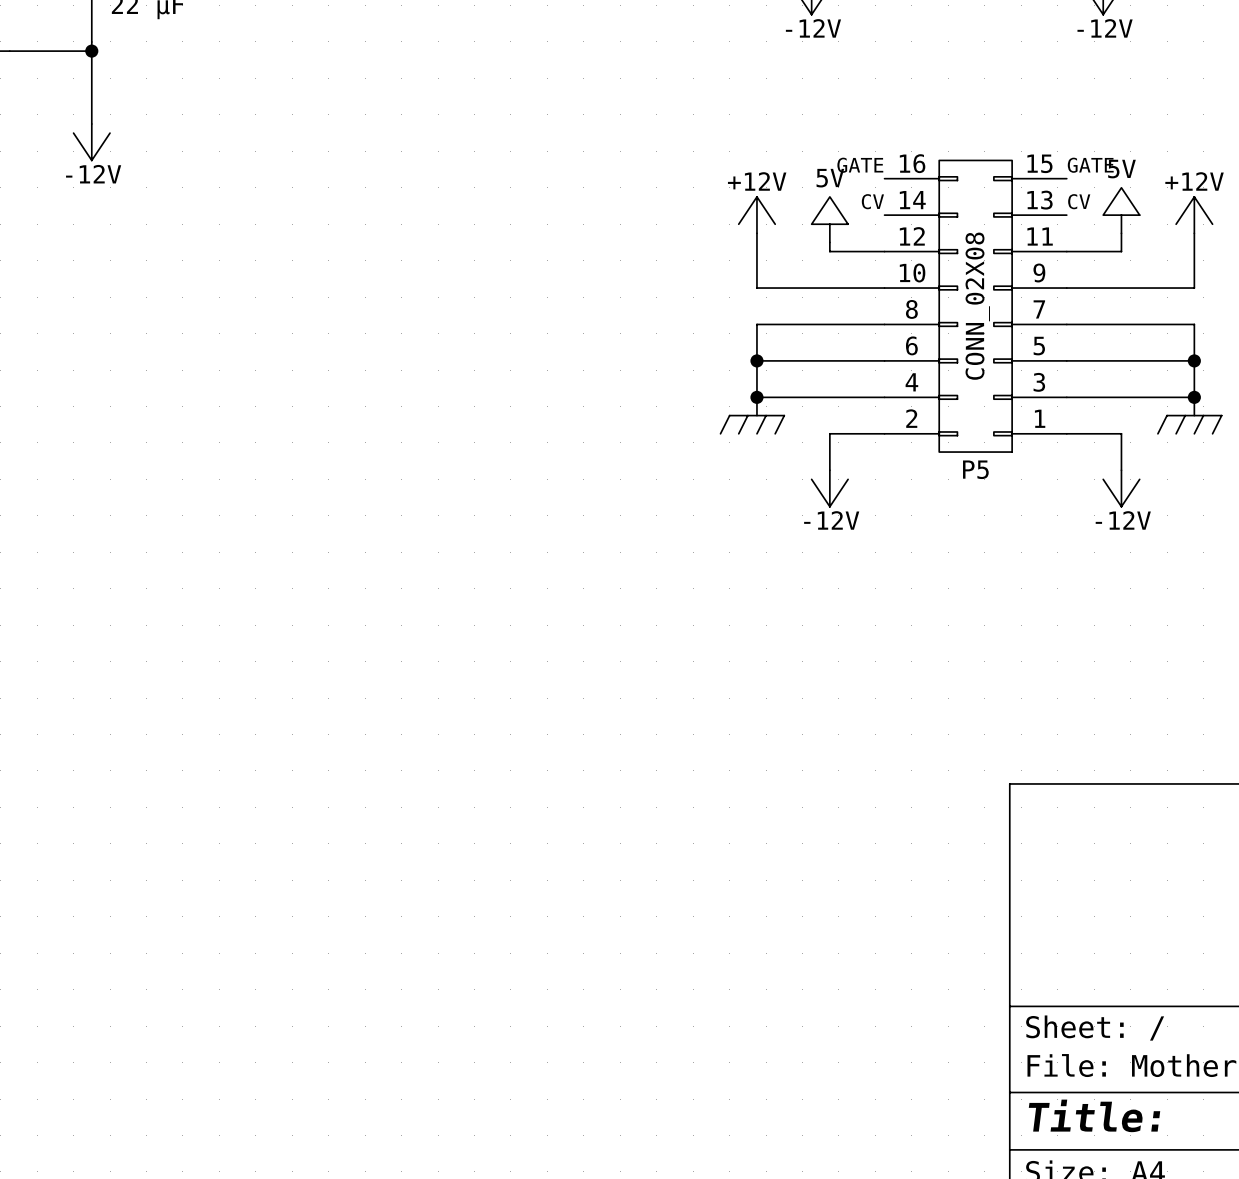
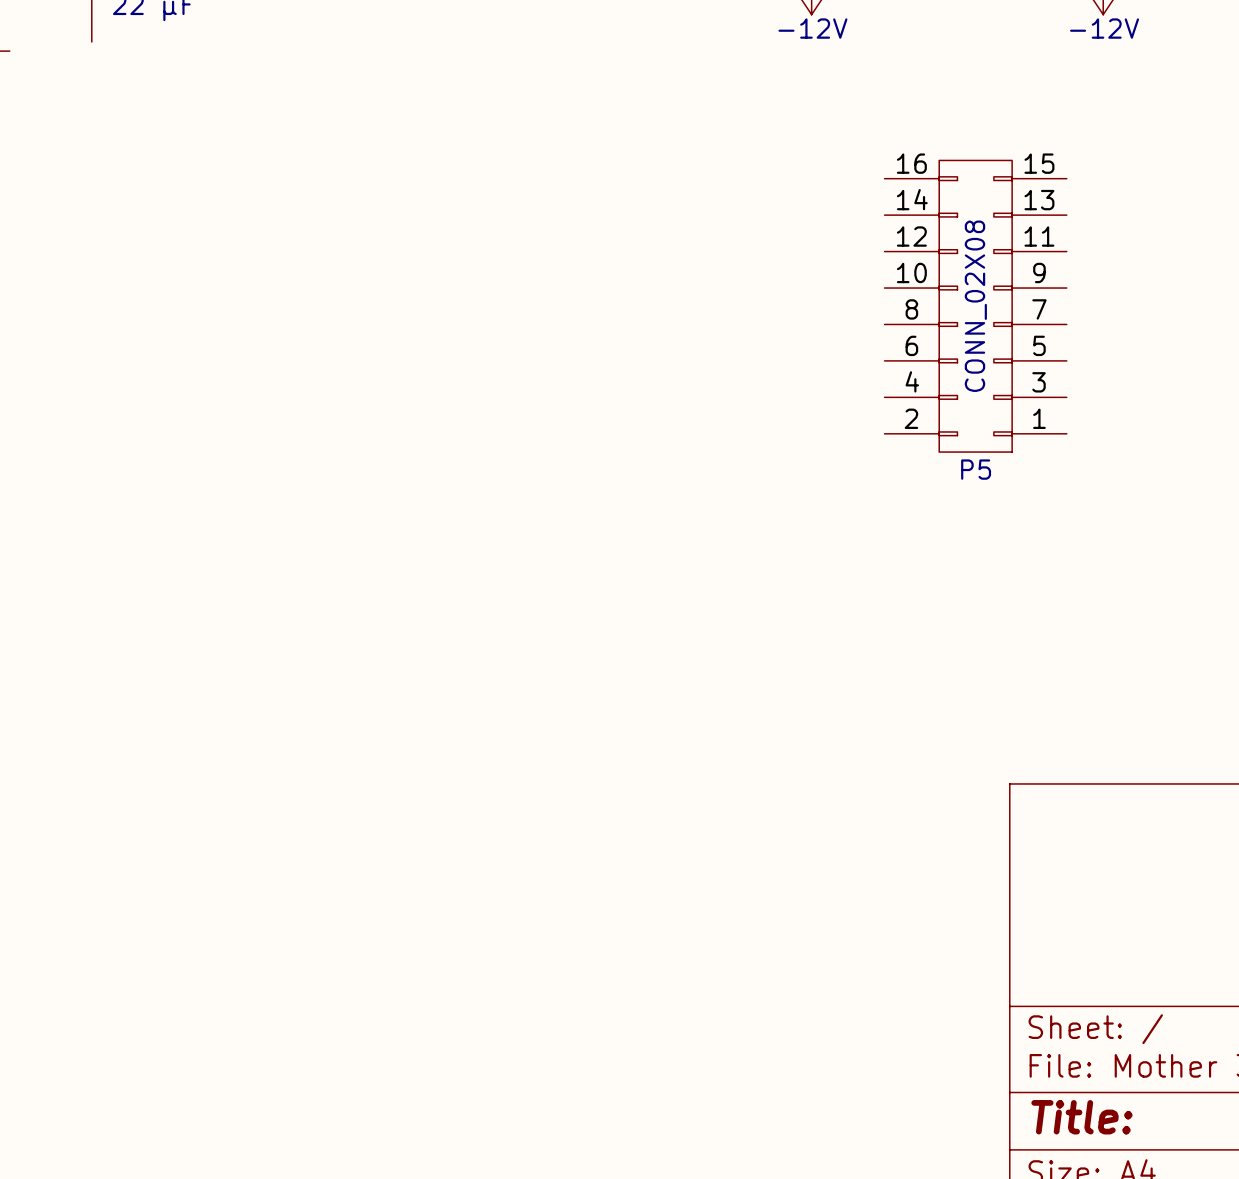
wire: (91, 41) (91, 124) -> none
wire: (9, 51) (91, 51) -> none
junction: (91, 51) -> none
power symbol: -12V (91, 142) -> none
label: GATE (860, 165) -> none
label: GATE (1090, 165) -> none
label: CV (872, 201) -> none
label: CV (1079, 201) -> none
power symbol: 5V (1121, 210) -> none
power symbol: +12V (756, 215) -> none
power symbol: +12V (1194, 215) -> none
power symbol: 5V (829, 219) -> none
wire: (756, 233) (756, 288) (884, 288) -> none
wire: (1121, 233) (1121, 251) (1066, 251) -> none
wire: (1194, 233) (1194, 288) (1066, 288) -> none
wire: (829, 242) (829, 251) (884, 251) -> none
wire: (884, 324) (756, 324) (756, 415) -> none
wire: (1066, 324) (1194, 324) (1194, 415) -> none
wire: (756, 360) (884, 360) -> none
junction: (756, 360) -> none
wire: (1066, 360) (1194, 360) -> none
junction: (1194, 360) -> none
wire: (756, 397) (884, 397) -> none
junction: (756, 397) -> none
wire: (1066, 397) (1194, 397) -> none
junction: (1194, 397) -> none
power symbol: (752, 424) -> none
power symbol: (1189, 424) -> none
wire: (884, 433) (829, 433) (829, 470) -> none
wire: (1066, 433) (1121, 433) (1121, 470) -> none
power symbol: -12V (829, 488) -> none
power symbol: -12V (1121, 488) -> none

